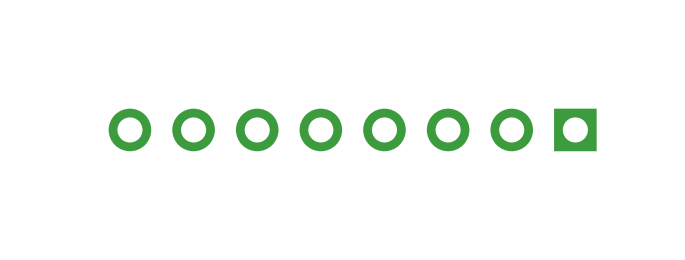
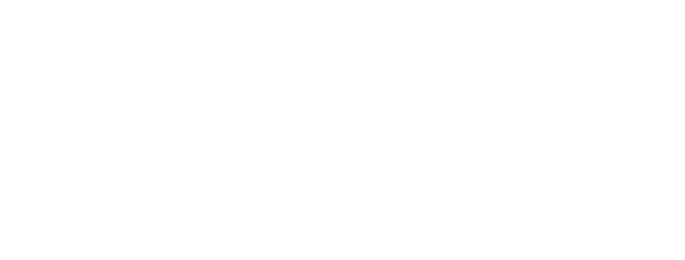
part: (352, 129) -> none

